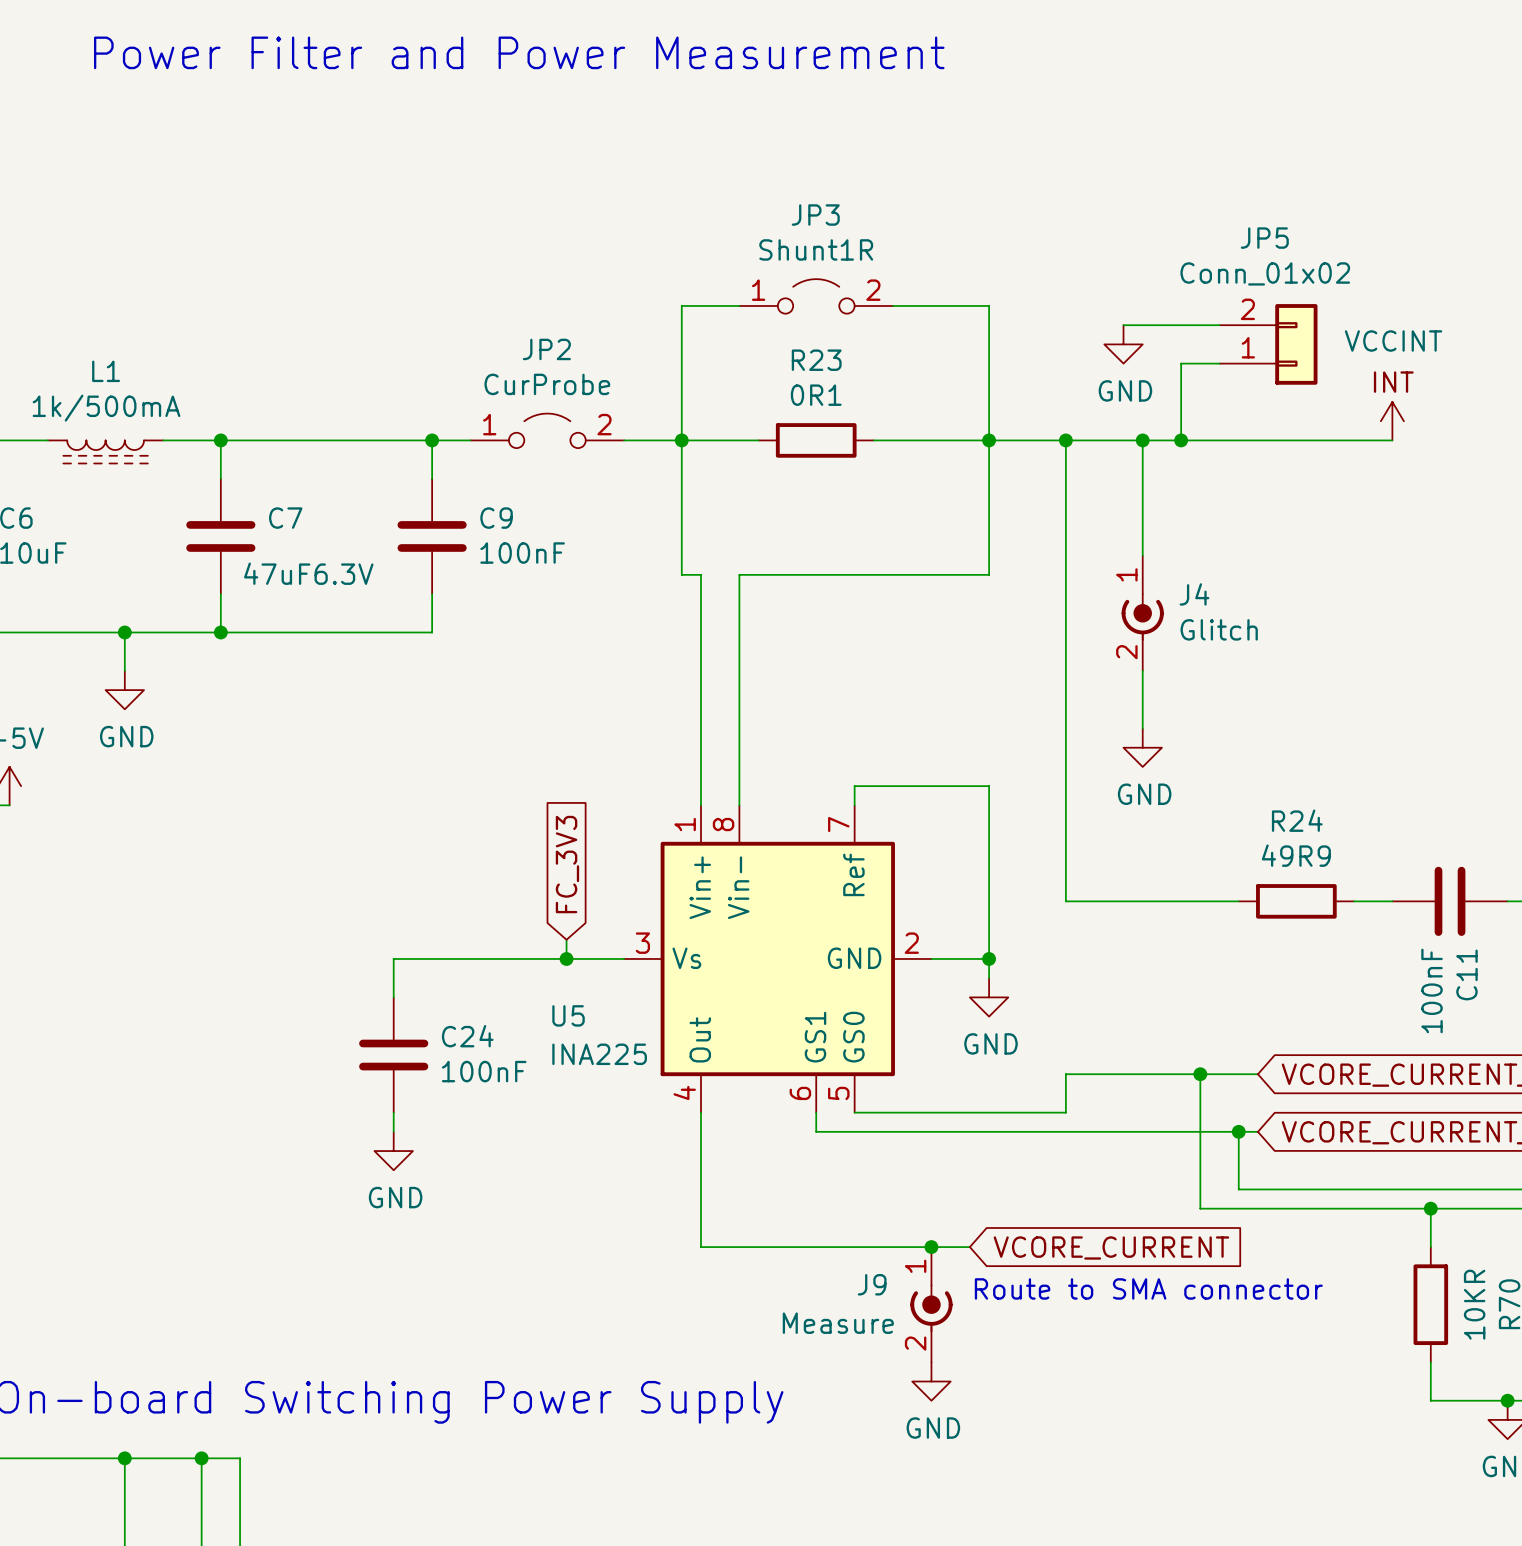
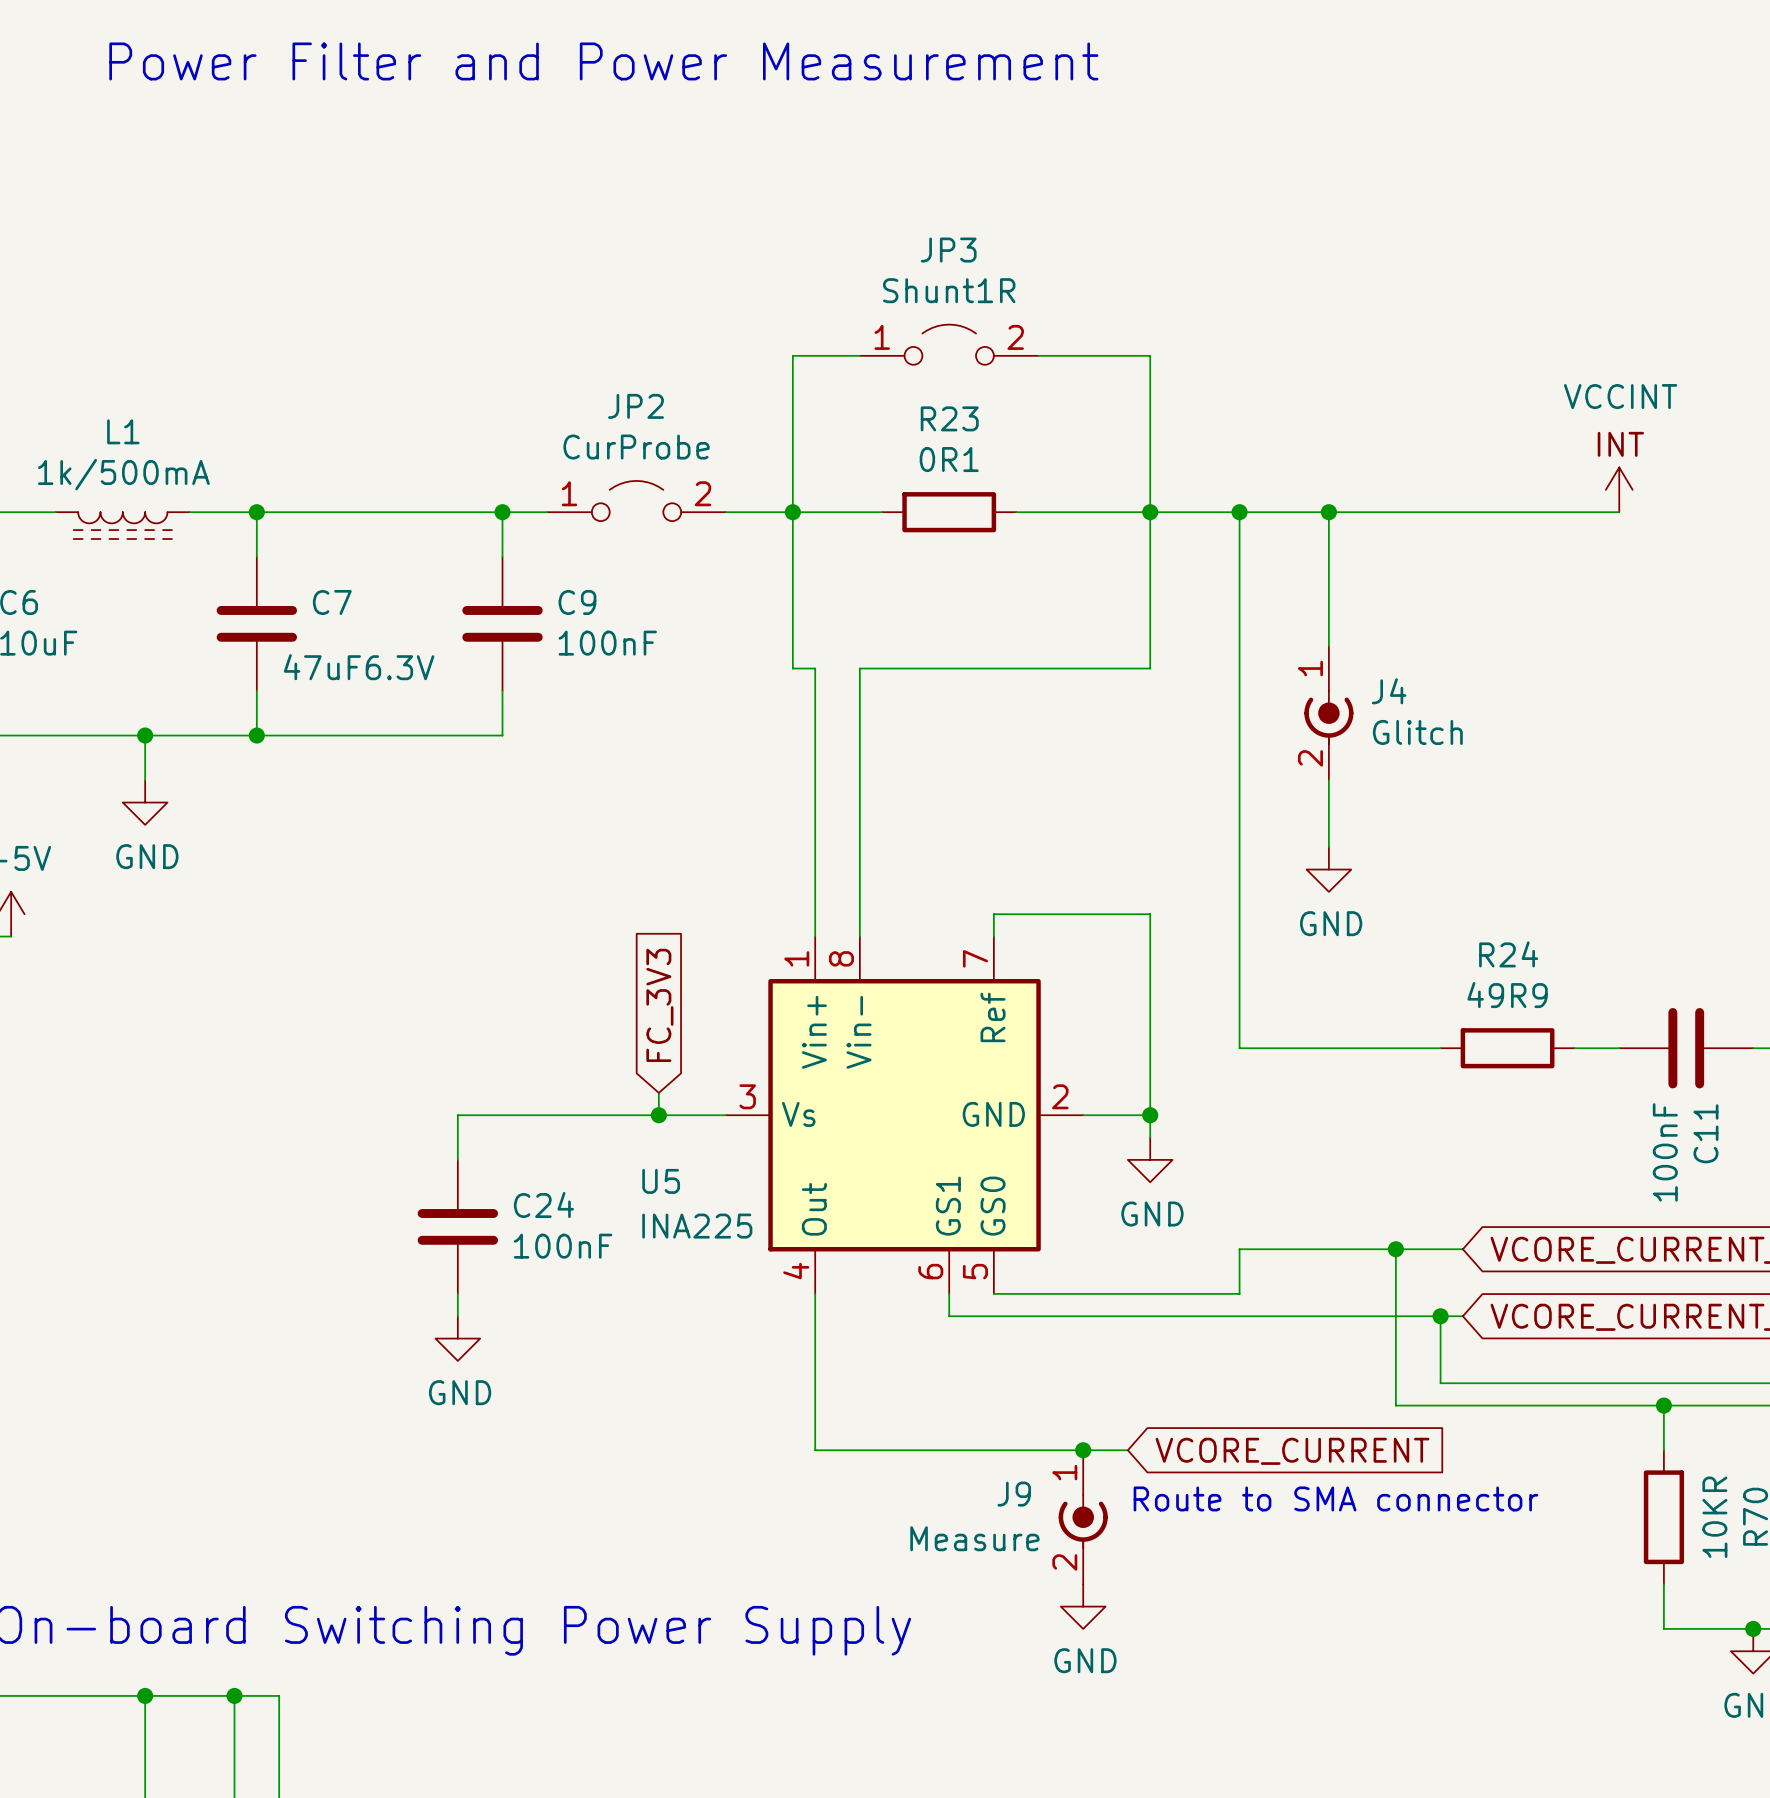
wire: (1123, 325) (1219, 325) -> none
power symbol: GND (1123, 344) -> none
JP5: Conn_01x02 (1268, 344) -> none
wire: (1219, 363) (1181, 363) (1181, 440) -> none
junction: (1181, 440) -> none

